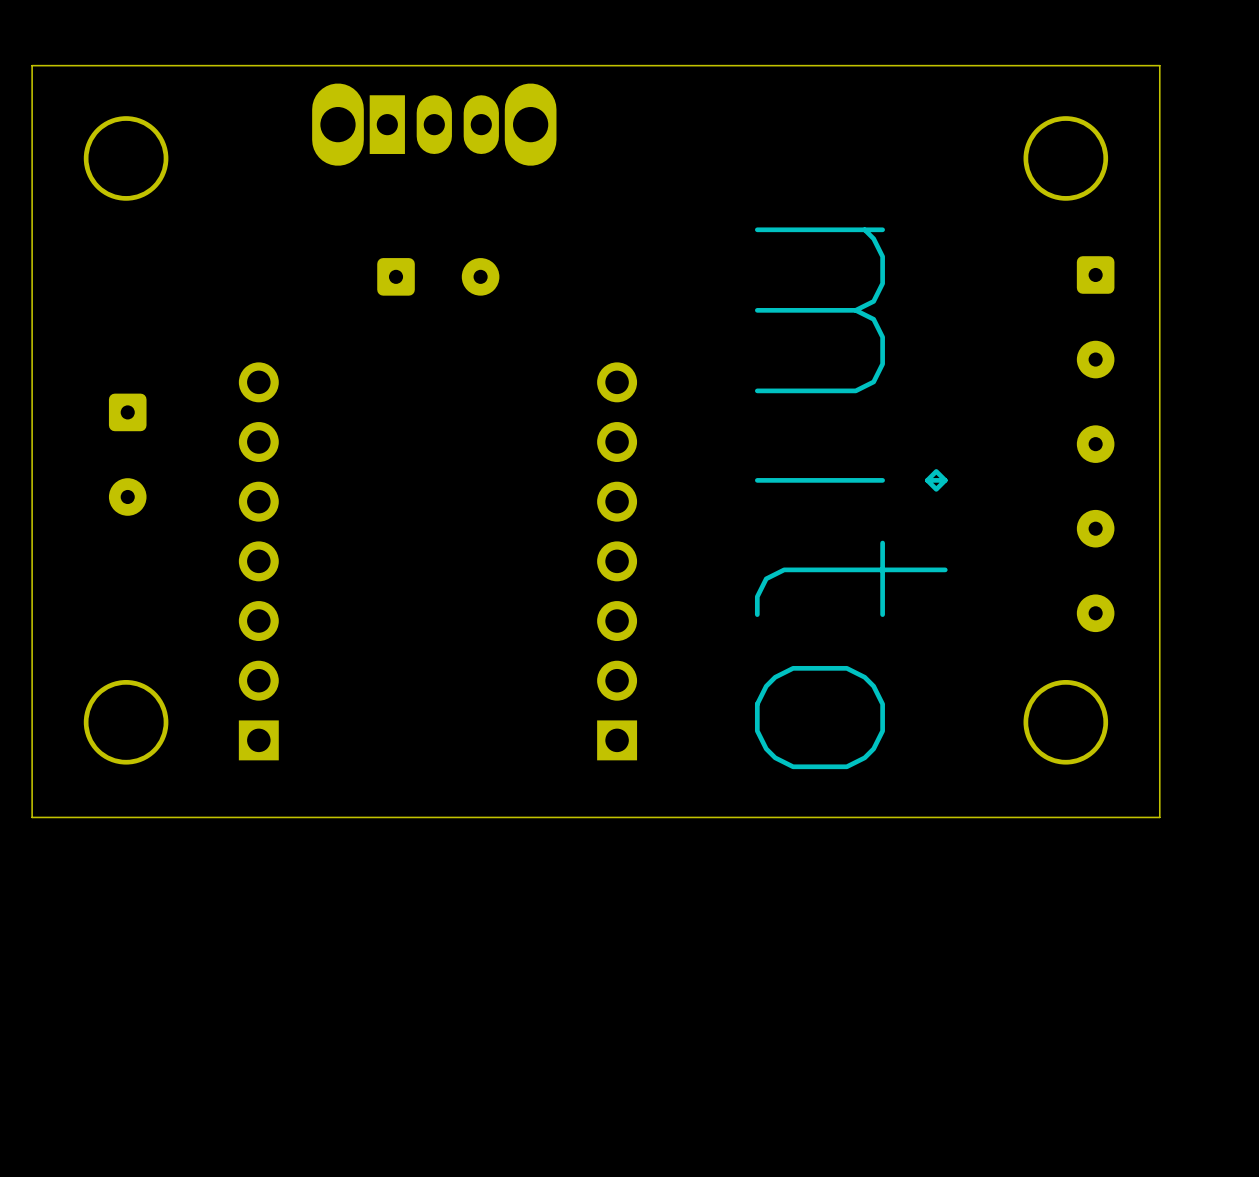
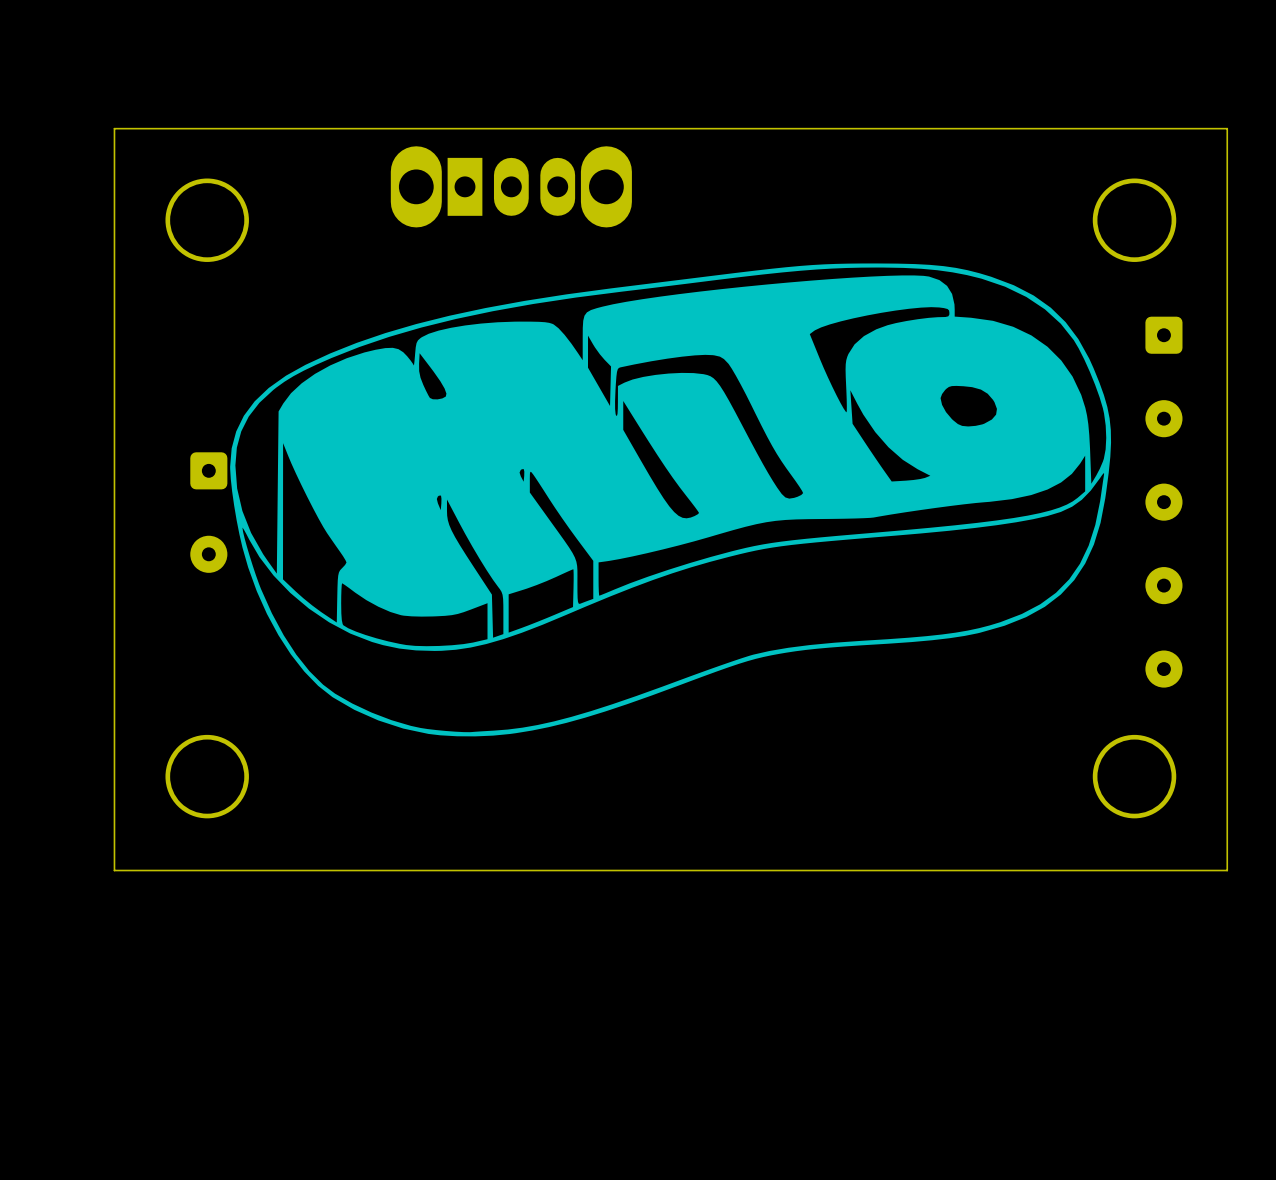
drawing: none -> [230, 263, 1112, 737]
part: (438, 276) -> none
text: mito (851, 498) -> none
part: (258, 561) -> none
part: (617, 561) -> none

